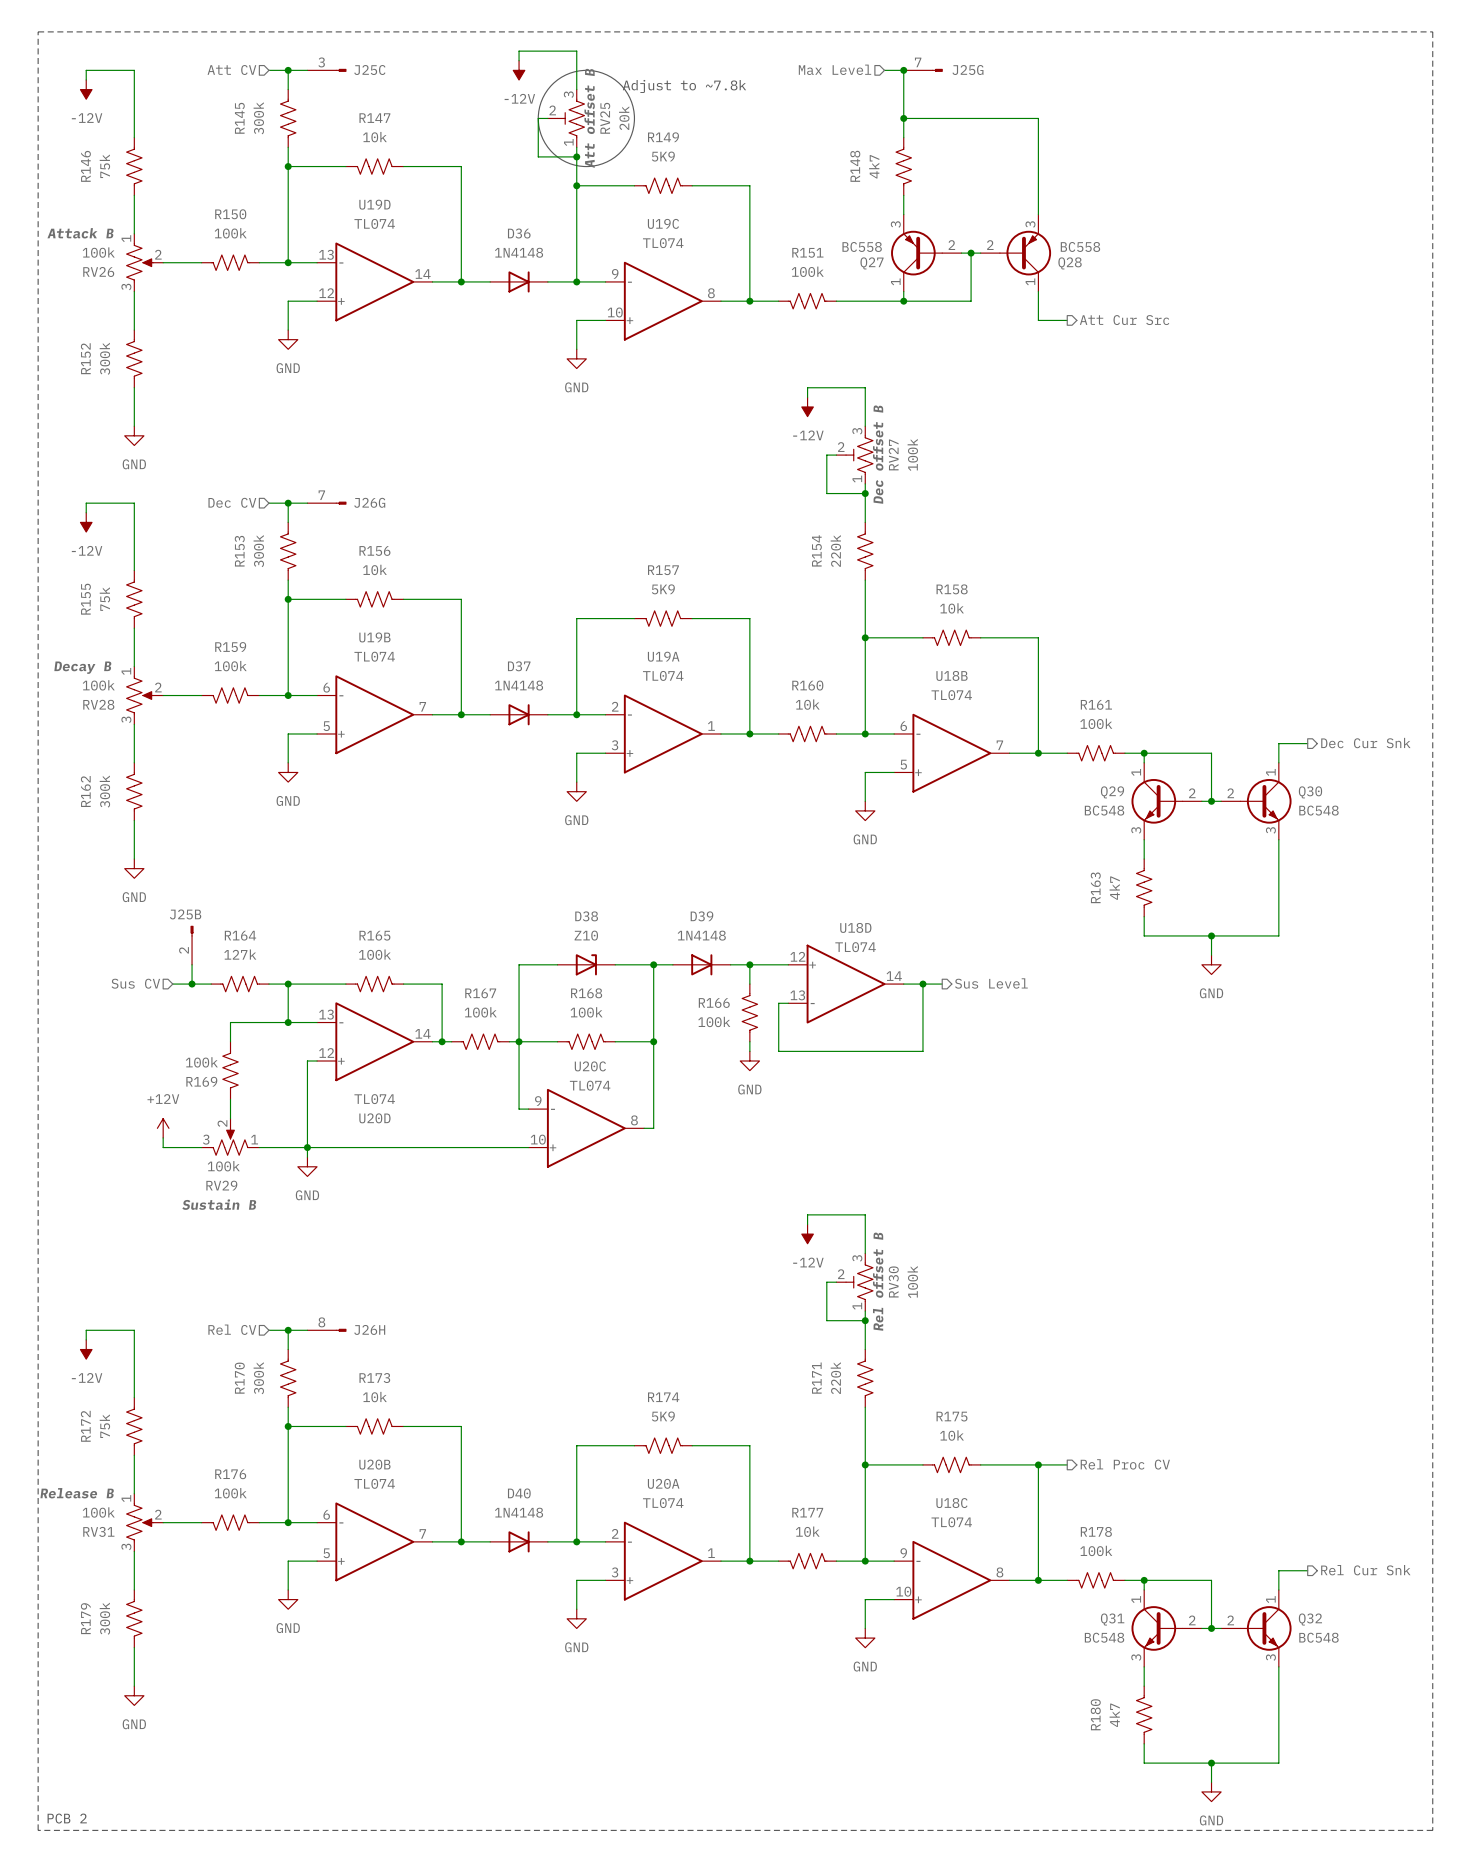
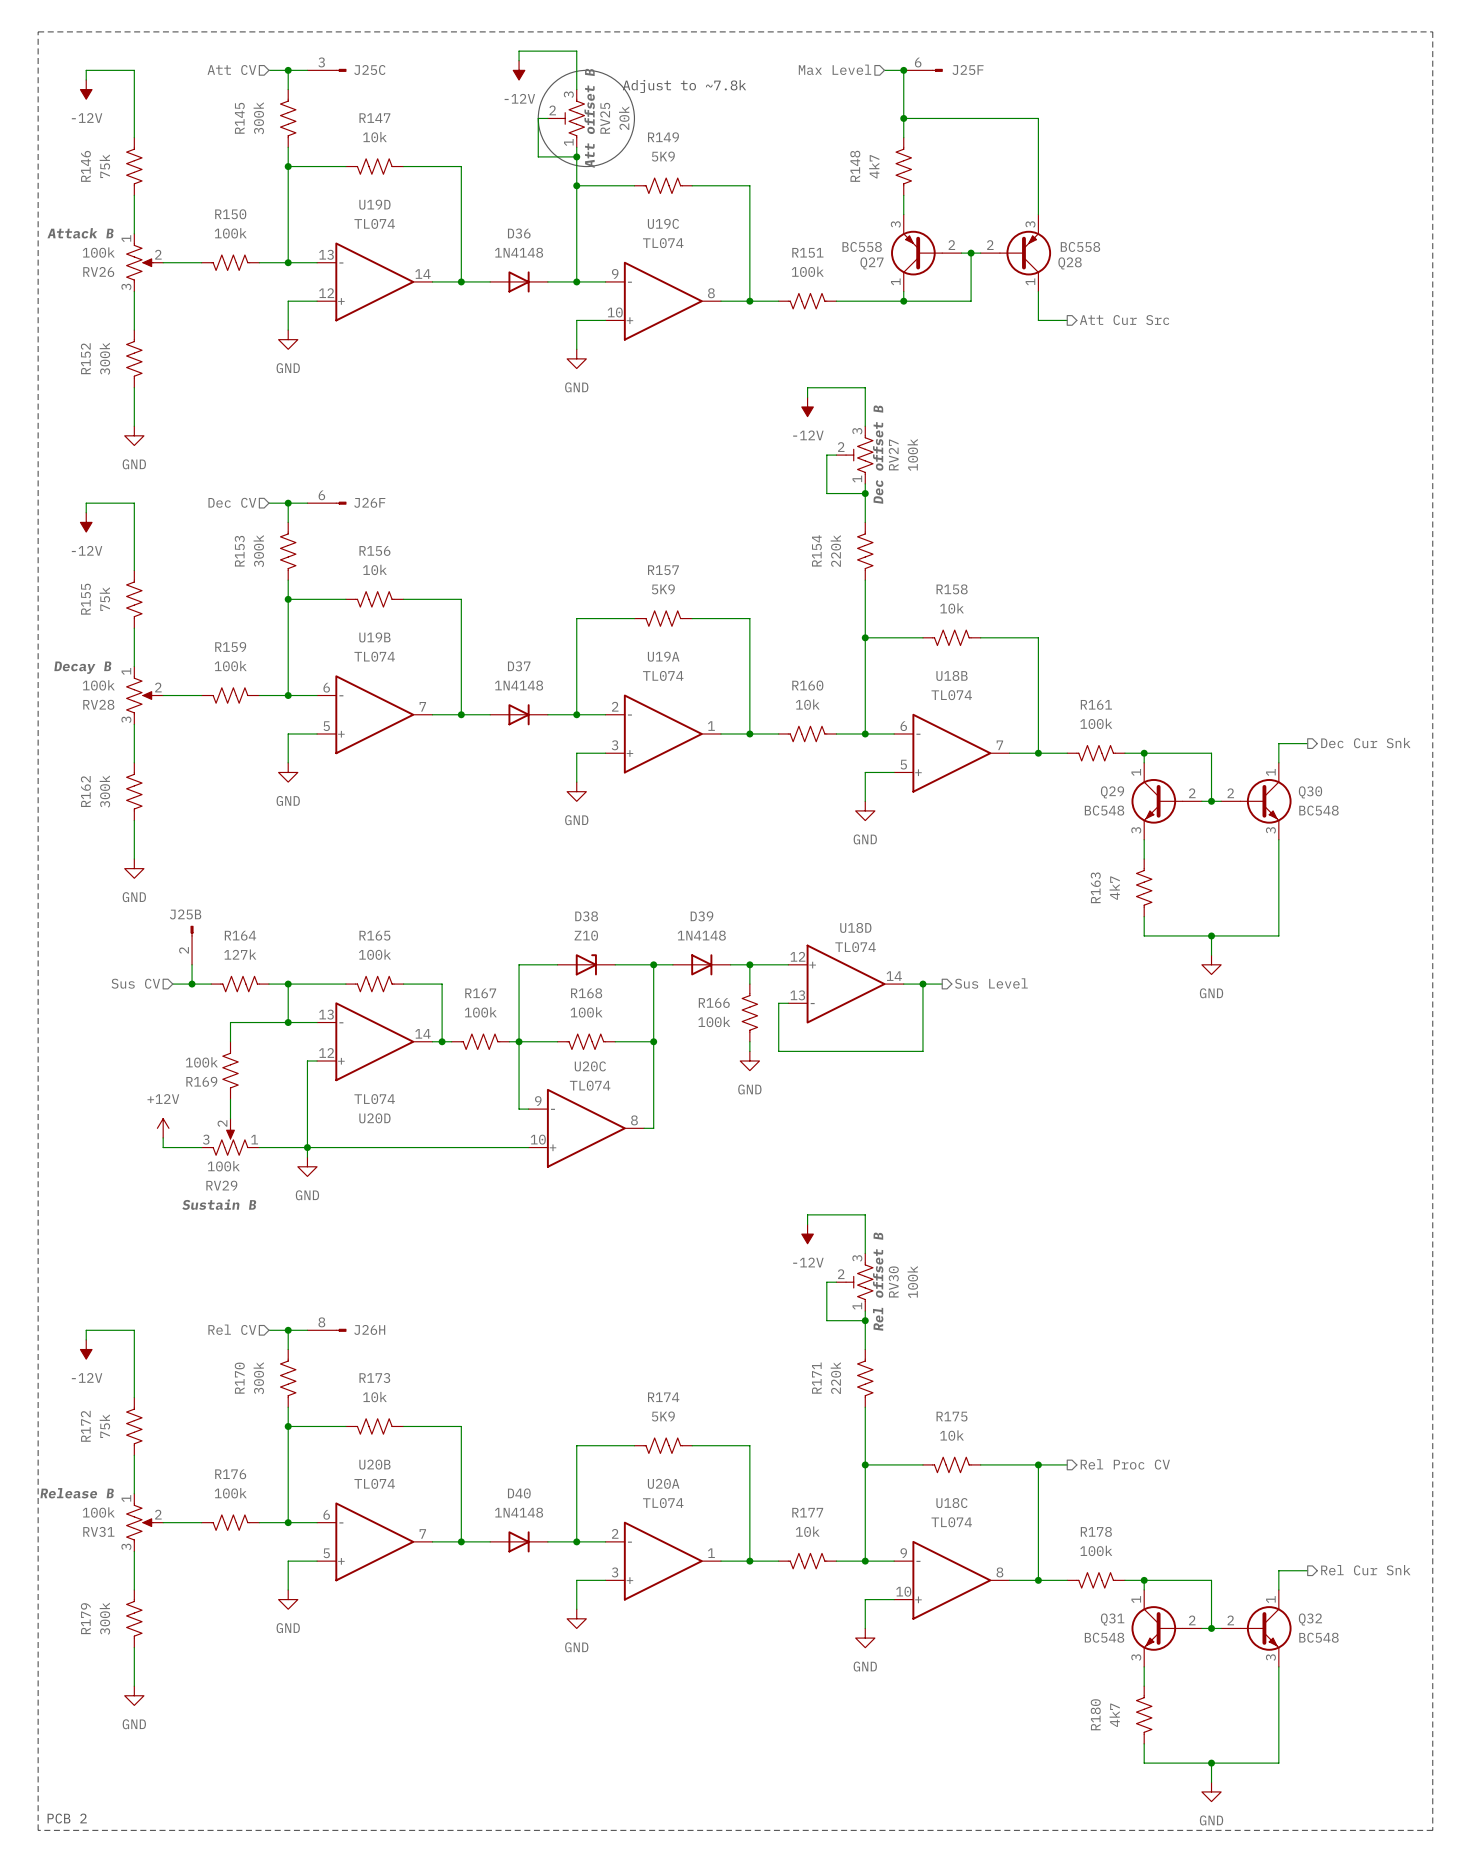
J25G pin number: 7 (918, 62) -> 6 (918, 62)
J25G name: J25G (967, 70) -> J25F (968, 70)
J26G pin number: 7 (321, 495) -> 6 (321, 495)
J26G name: J26G (369, 502) -> J26F (369, 502)

